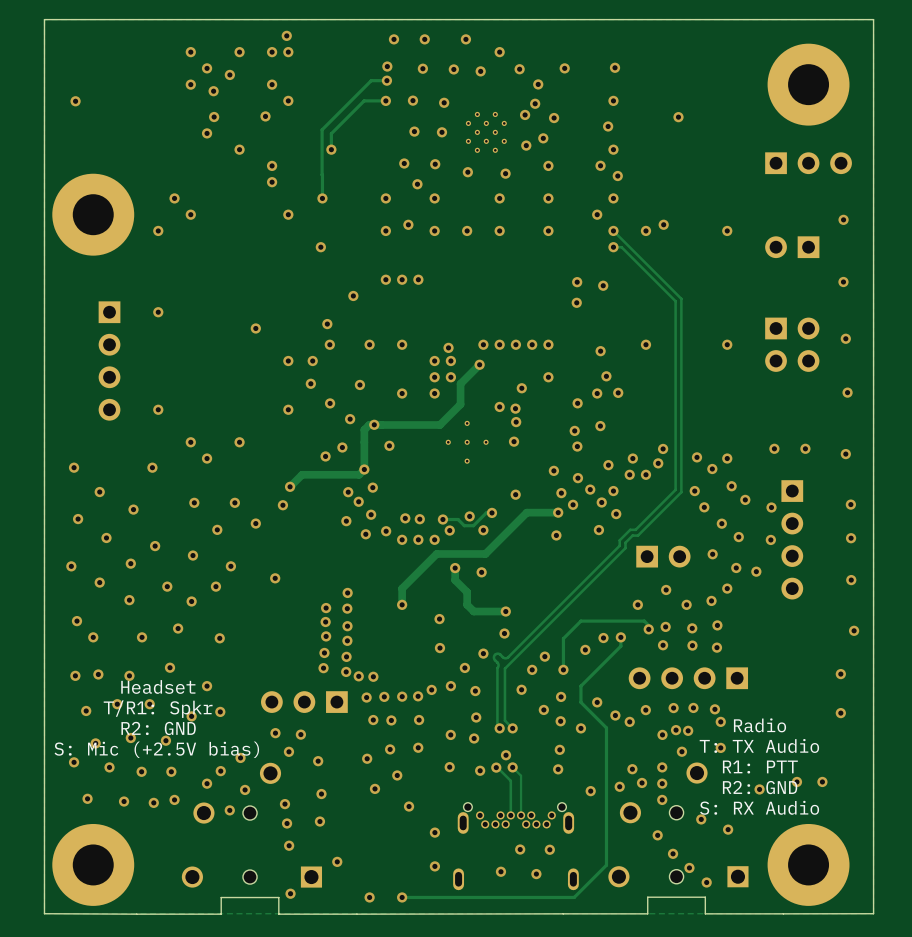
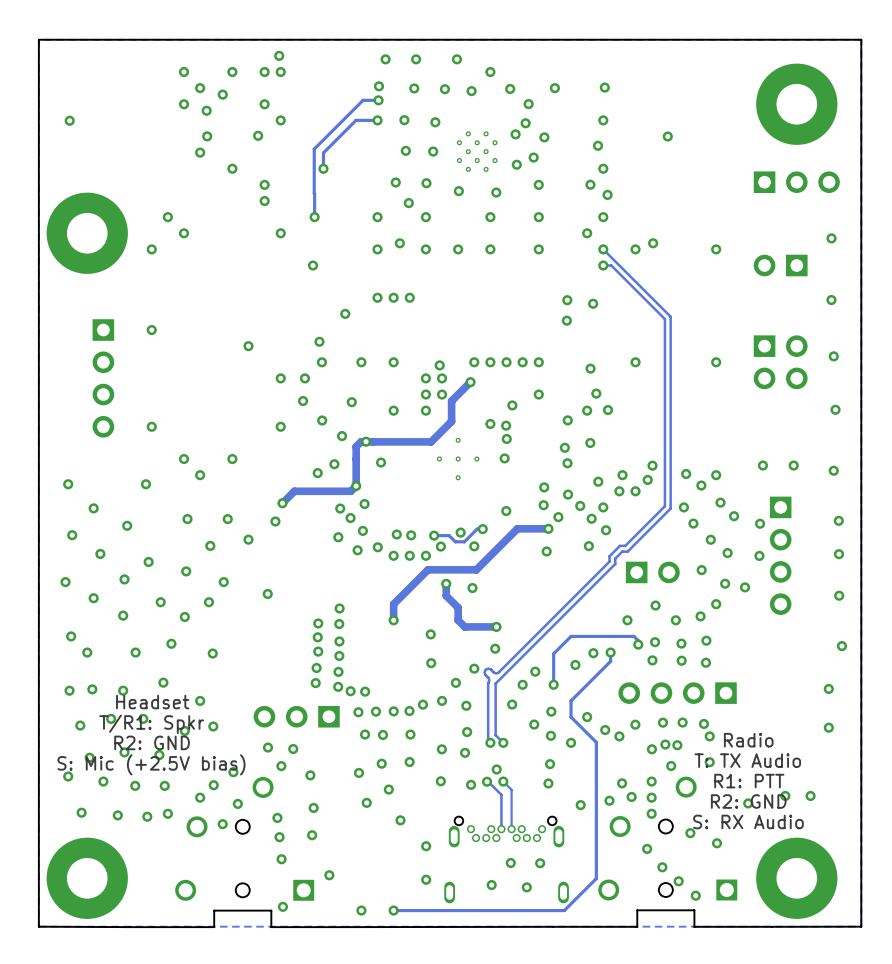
via: none -> (543, 505)
via: (561, 493) -> none
via: none -> (558, 517)
via: (573, 504) -> none

